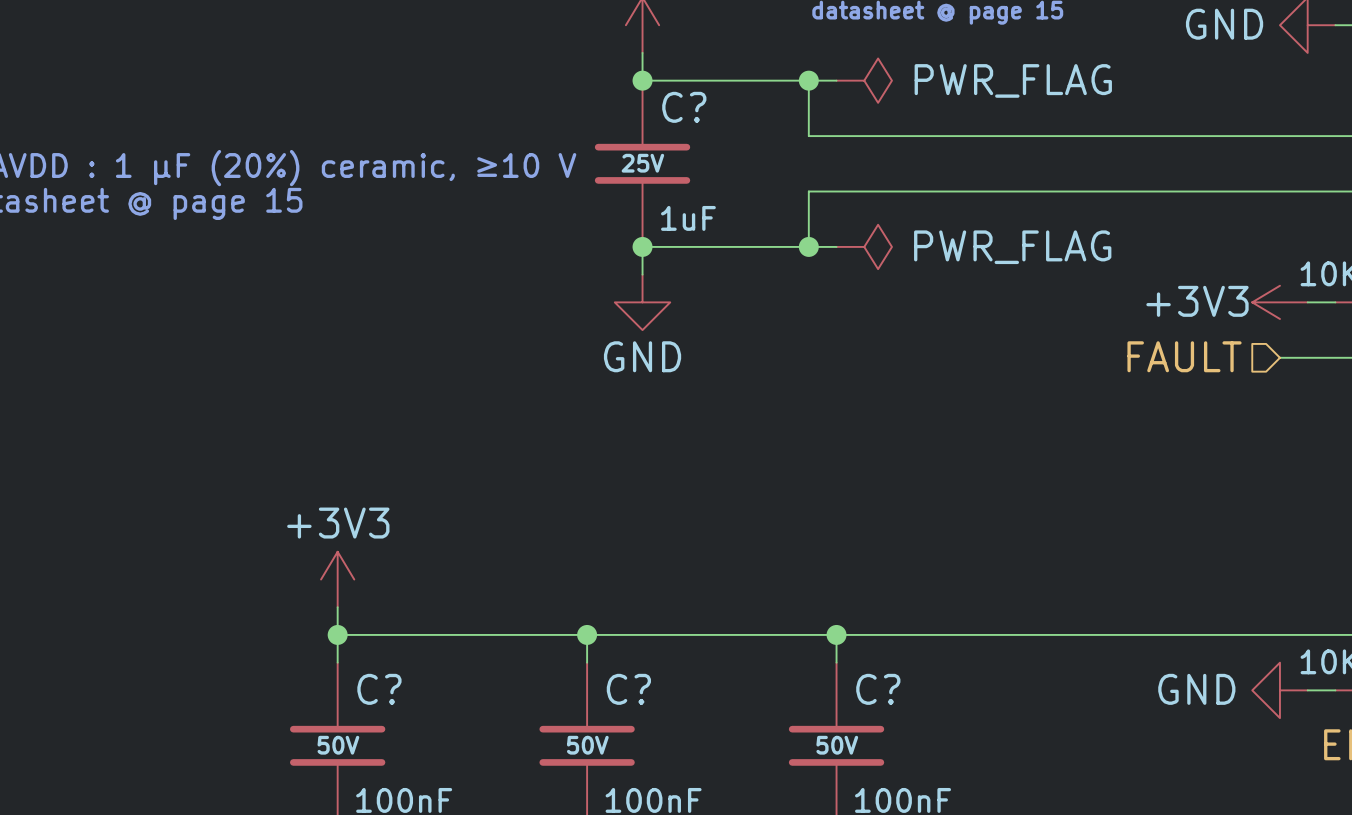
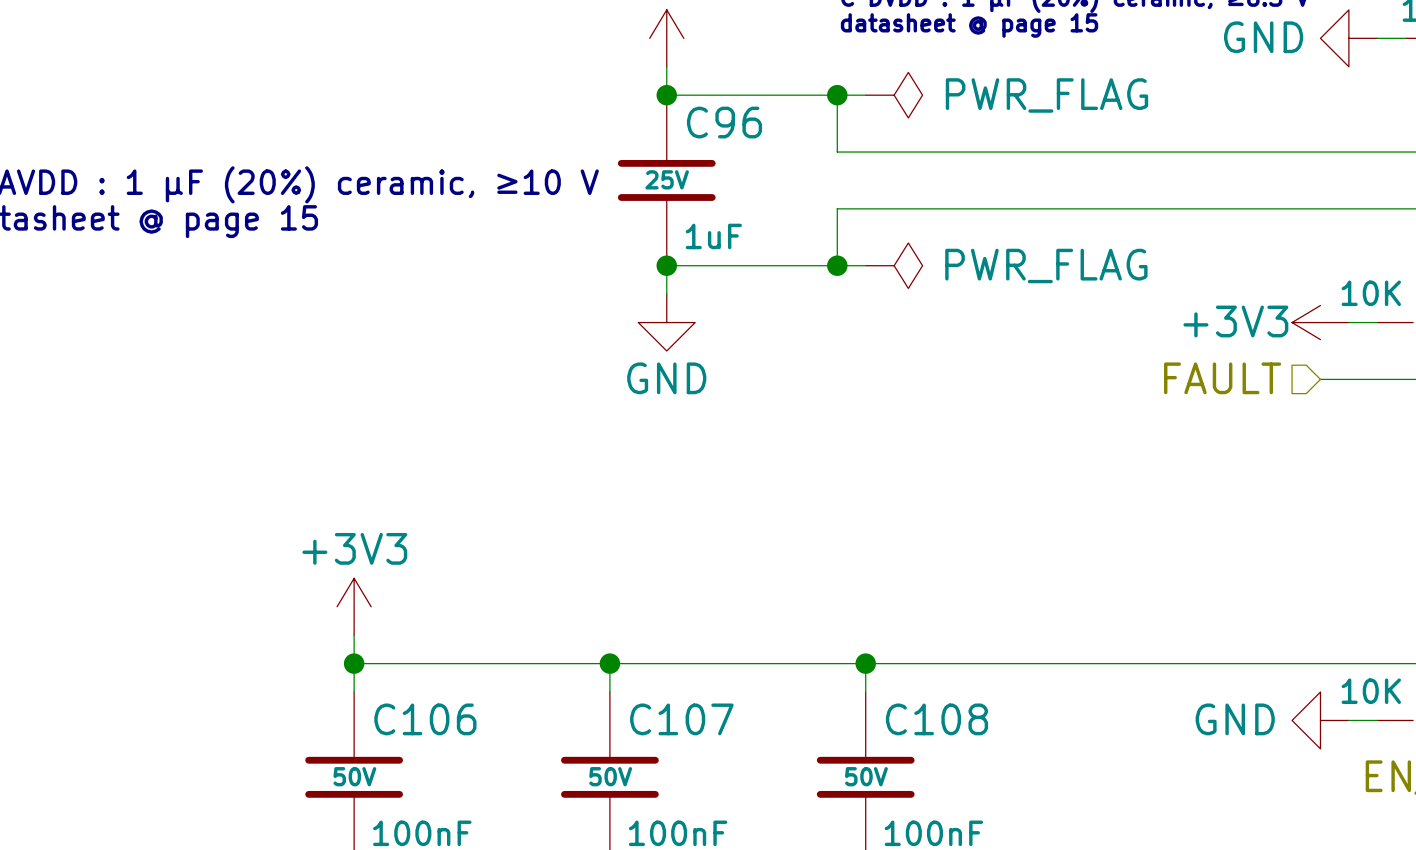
C? name: C? (684, 107) -> C96 (724, 122)
C? name: C? (379, 689) -> C106 (425, 719)
C? name: C? (628, 689) -> C107 (681, 719)
C? name: C? (878, 689) -> C108 (936, 719)

